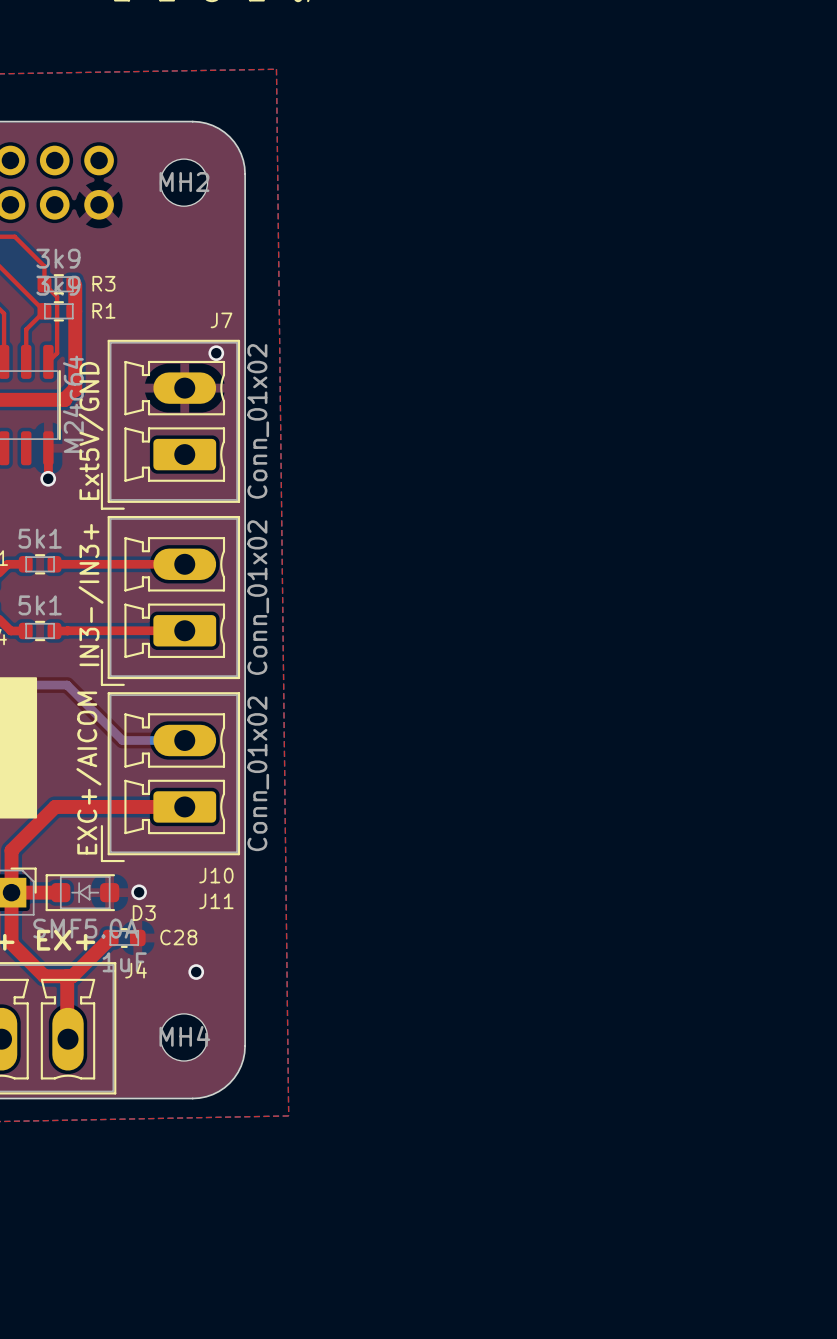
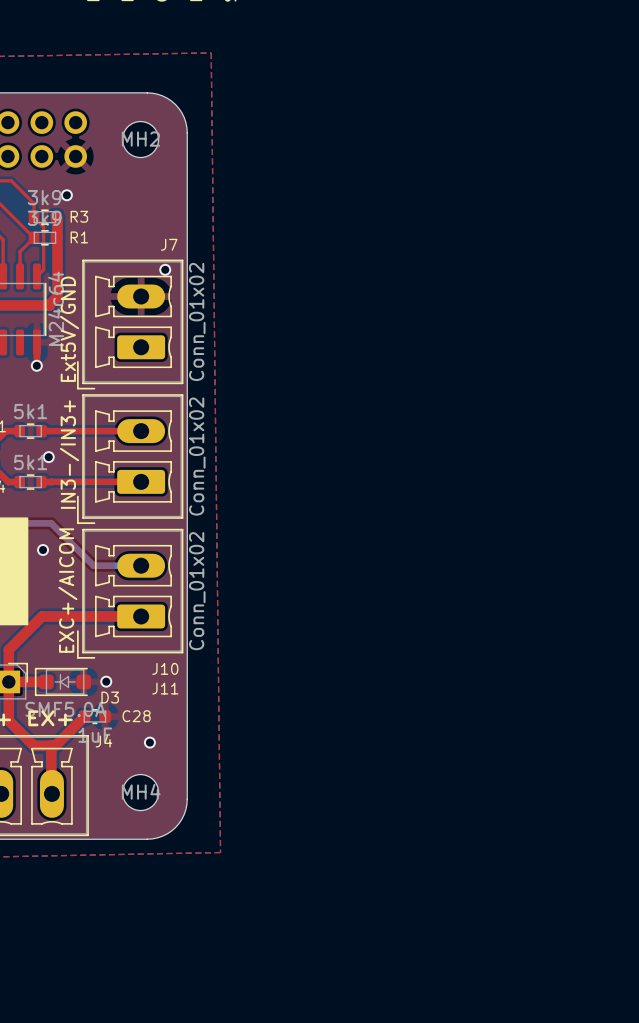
via: none -> (66, 195)
via: none -> (48, 457)
via: none -> (43, 550)

